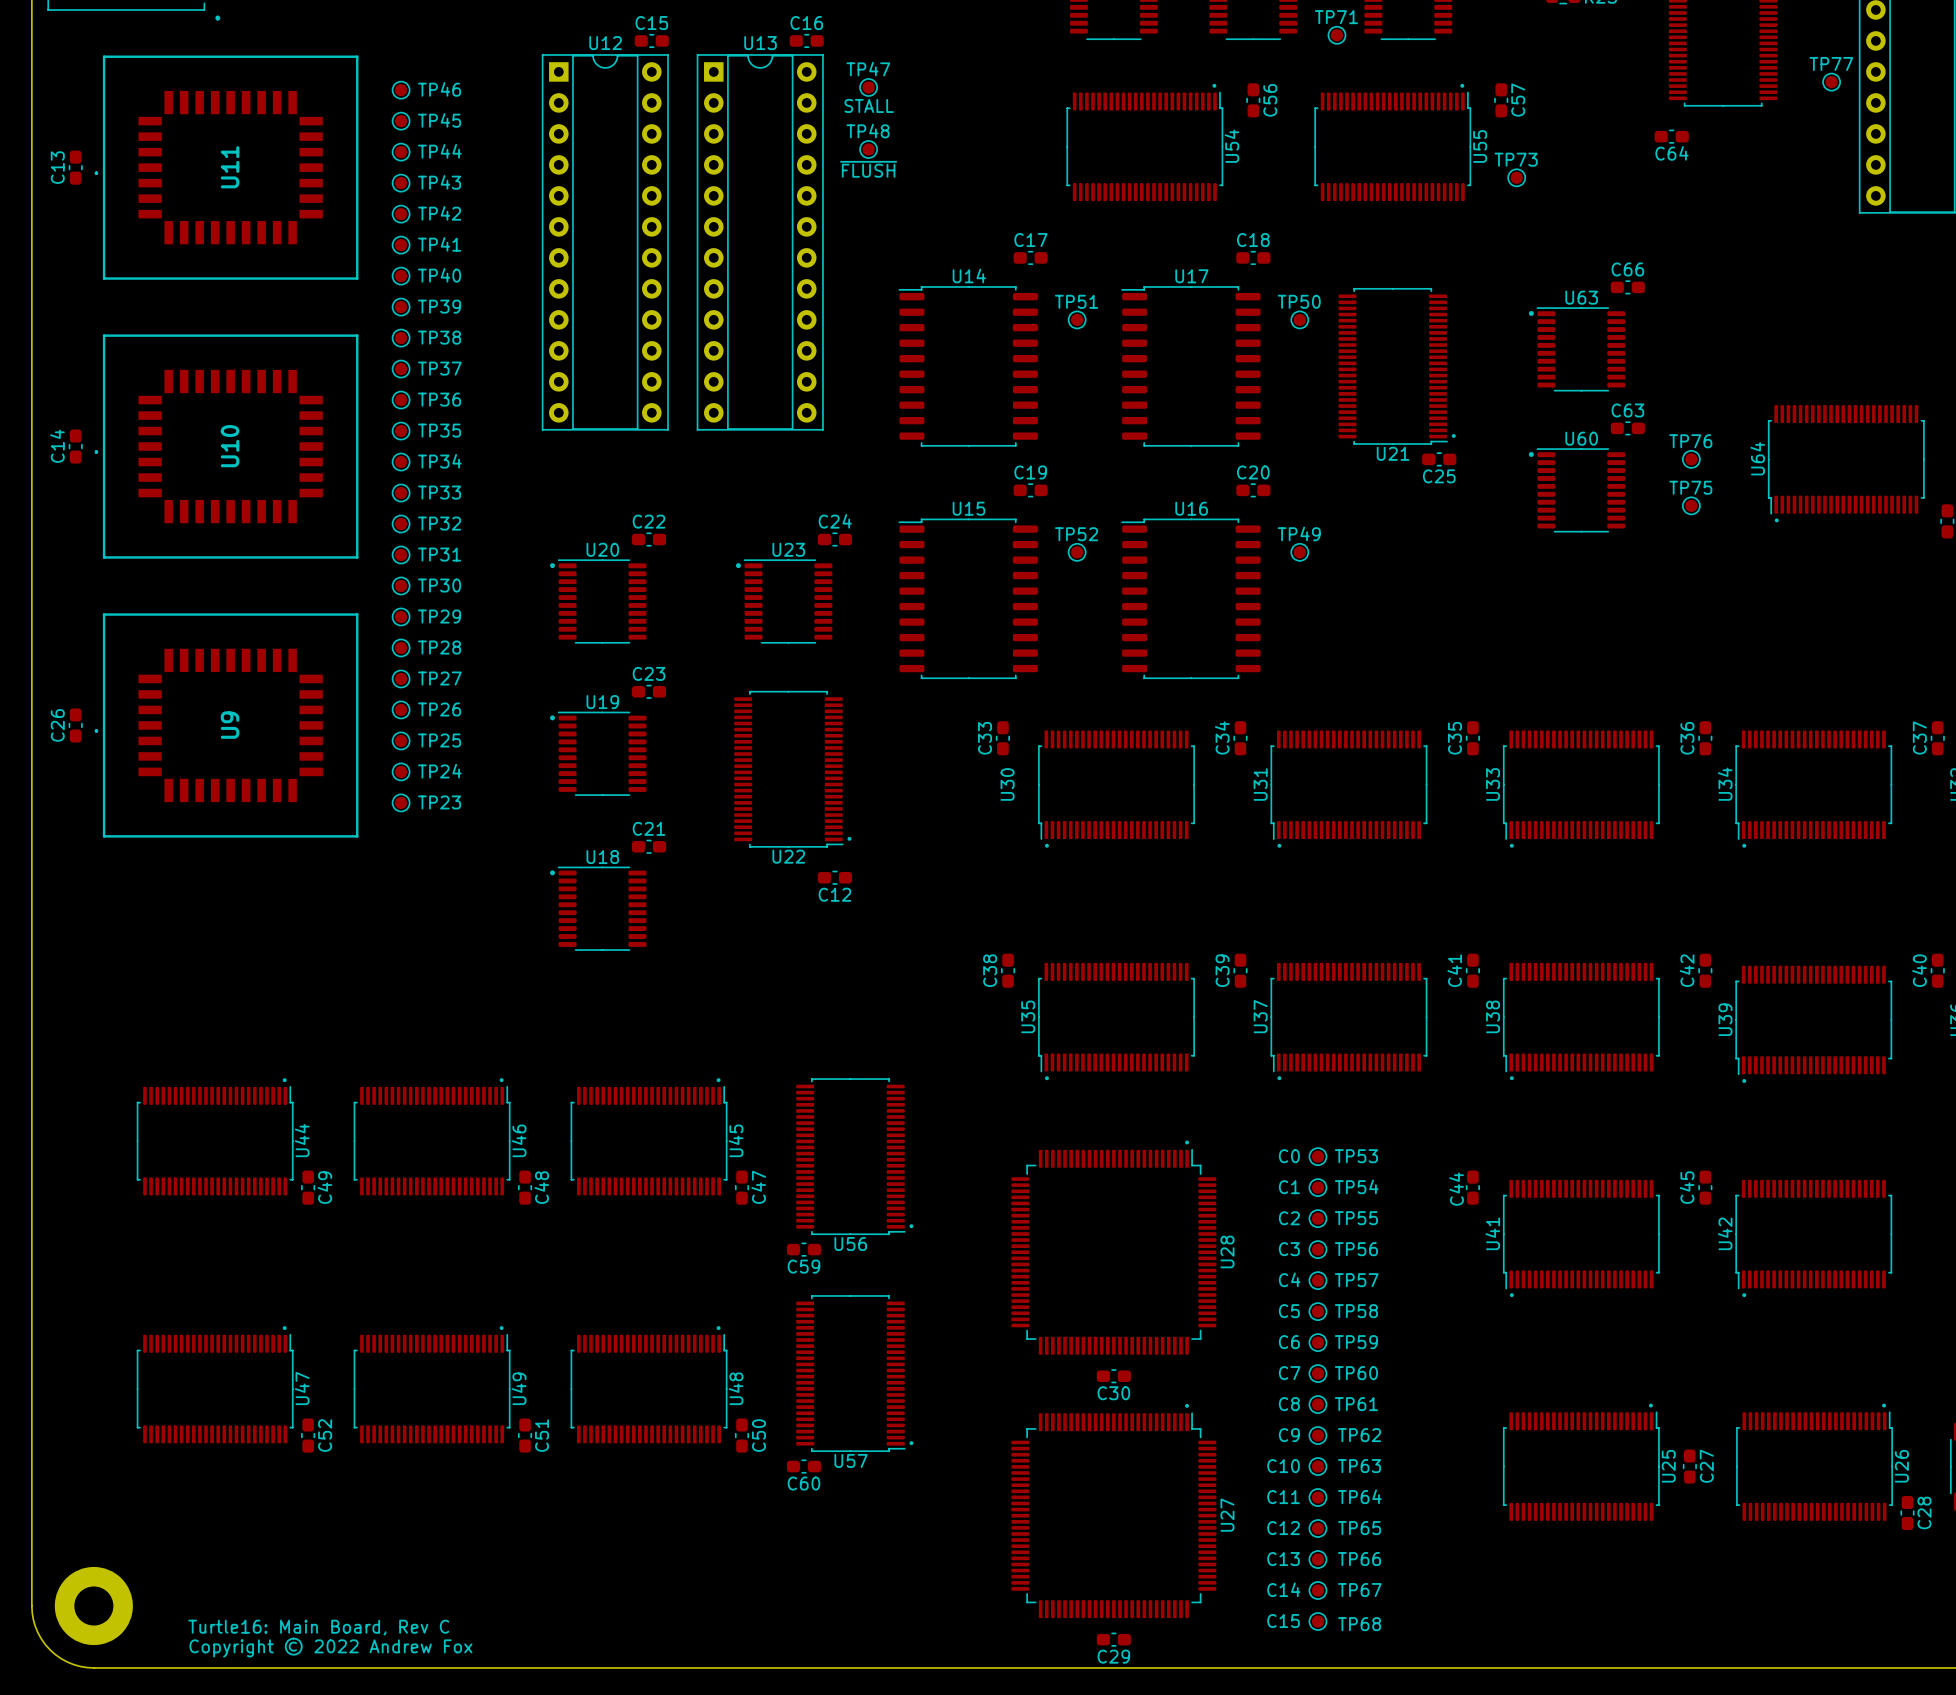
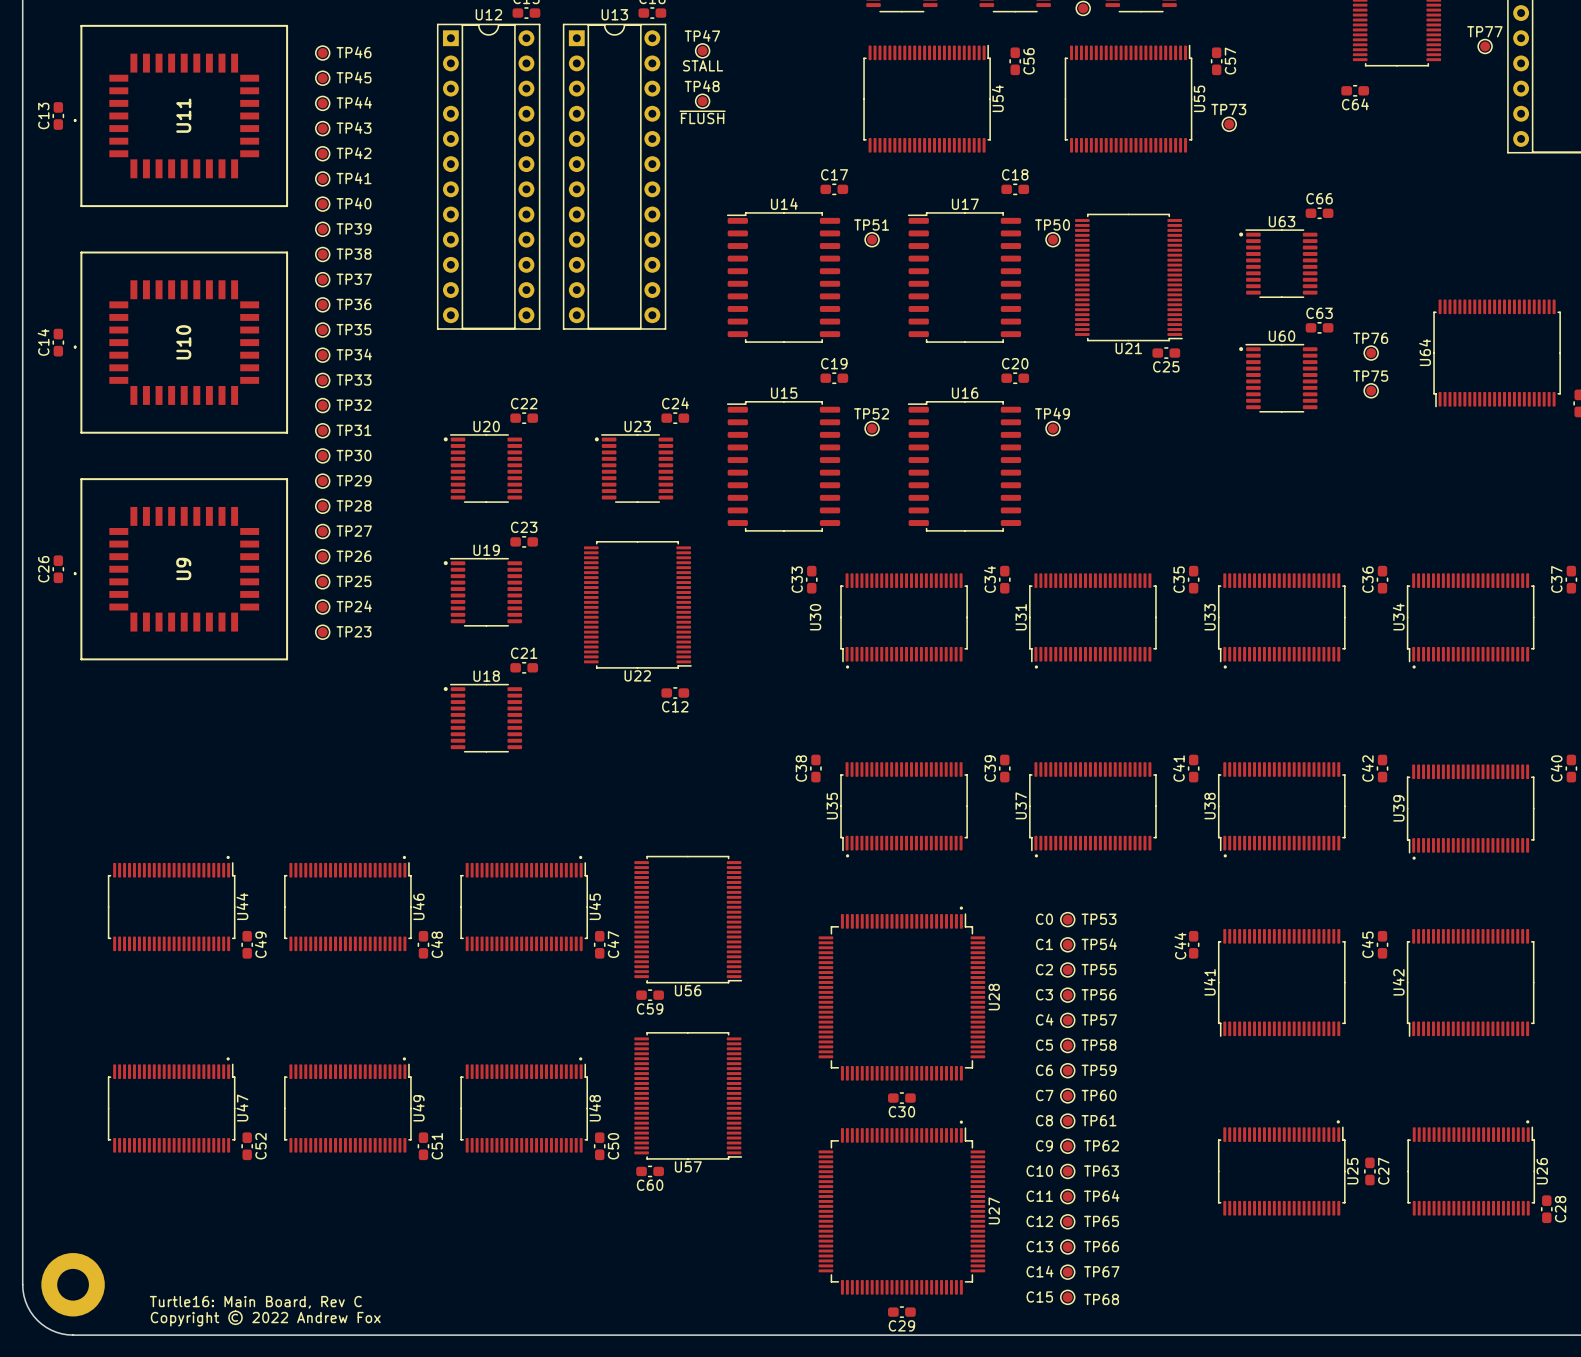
U54 footprint: [1066, 83, 1224, 202] -> [863, 44, 991, 153]
U55 footprint: [1314, 83, 1472, 202] -> [1064, 44, 1193, 153]
U21 footprint: [1338, 288, 1456, 445] -> [1074, 213, 1183, 342]
U64 footprint: [1768, 405, 1925, 523] -> [1433, 299, 1561, 408]
U22 footprint: [734, 690, 852, 848] -> [583, 541, 692, 669]
U56 footprint: [796, 1078, 914, 1235] -> [634, 855, 742, 984]
U41 footprint: [1503, 1179, 1660, 1298] -> [1218, 929, 1346, 1037]
U42 footprint: [1735, 1179, 1893, 1298] -> [1406, 929, 1535, 1037]
U57 footprint: [796, 1295, 914, 1452] -> [634, 1032, 742, 1160]

